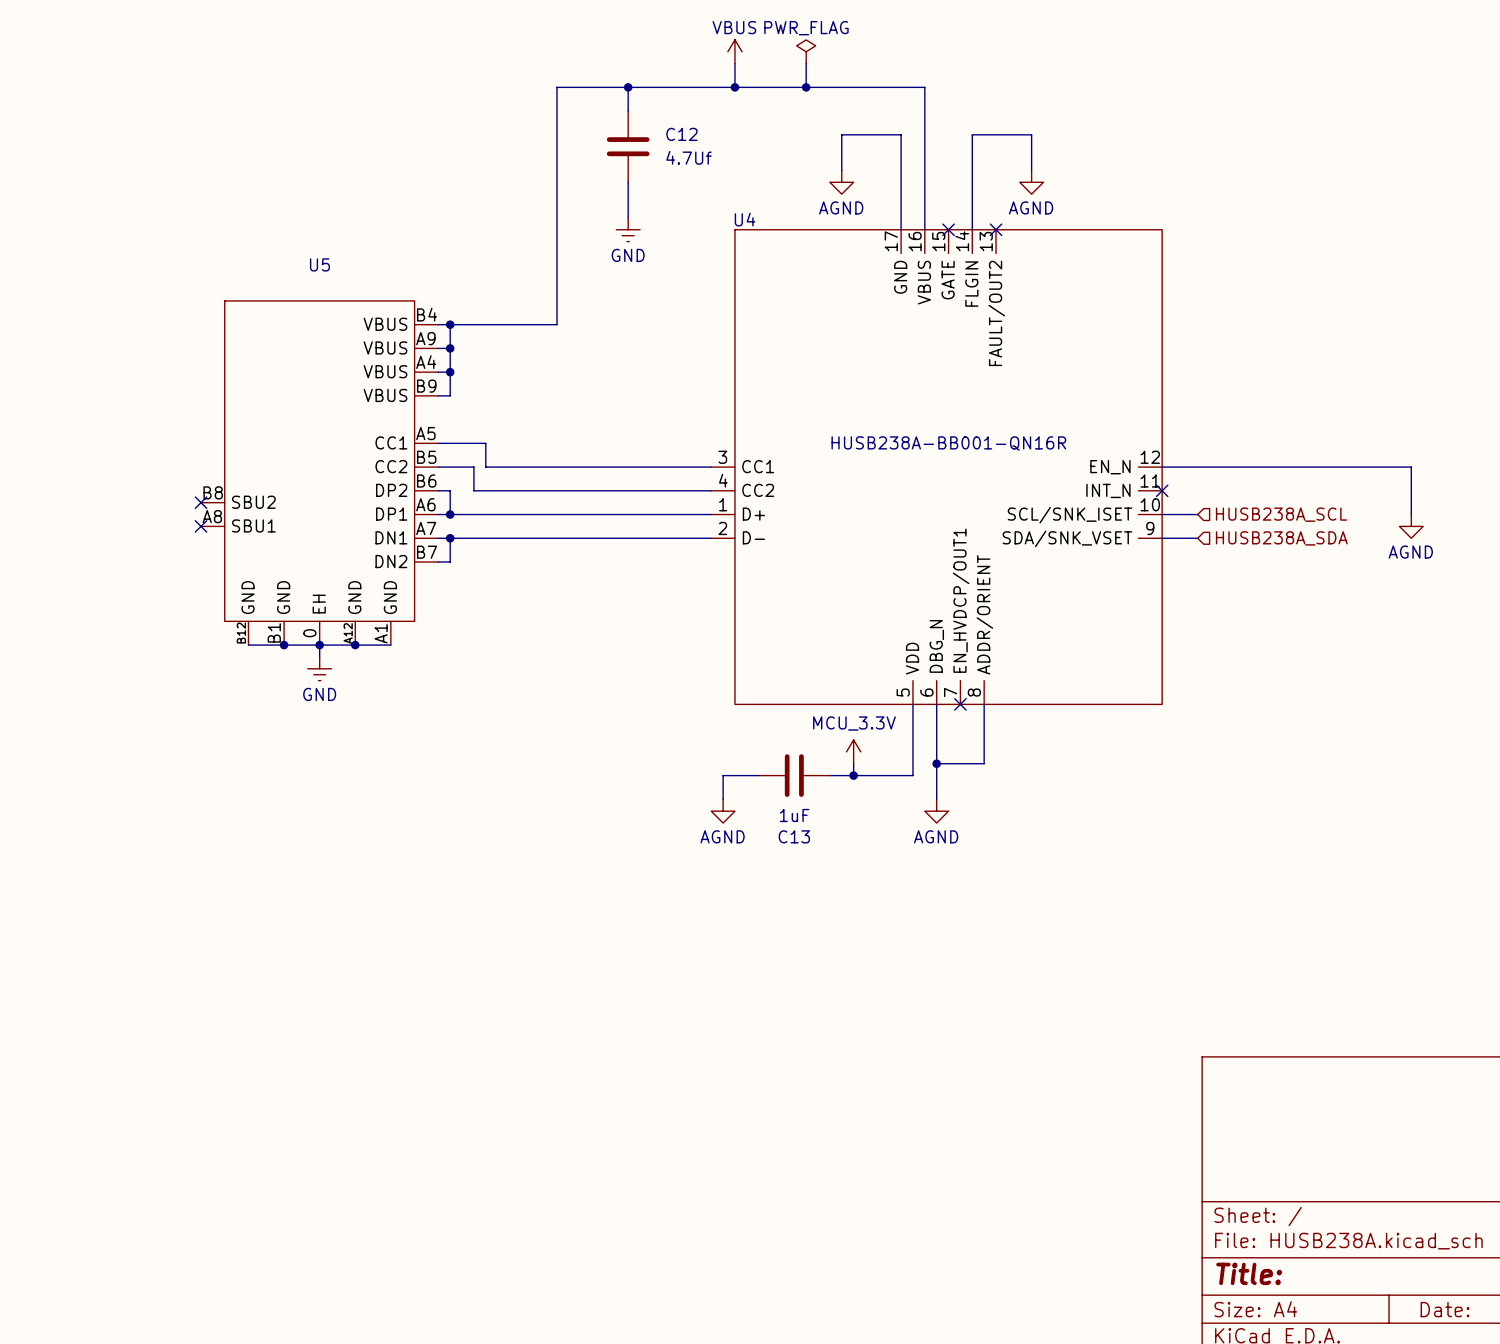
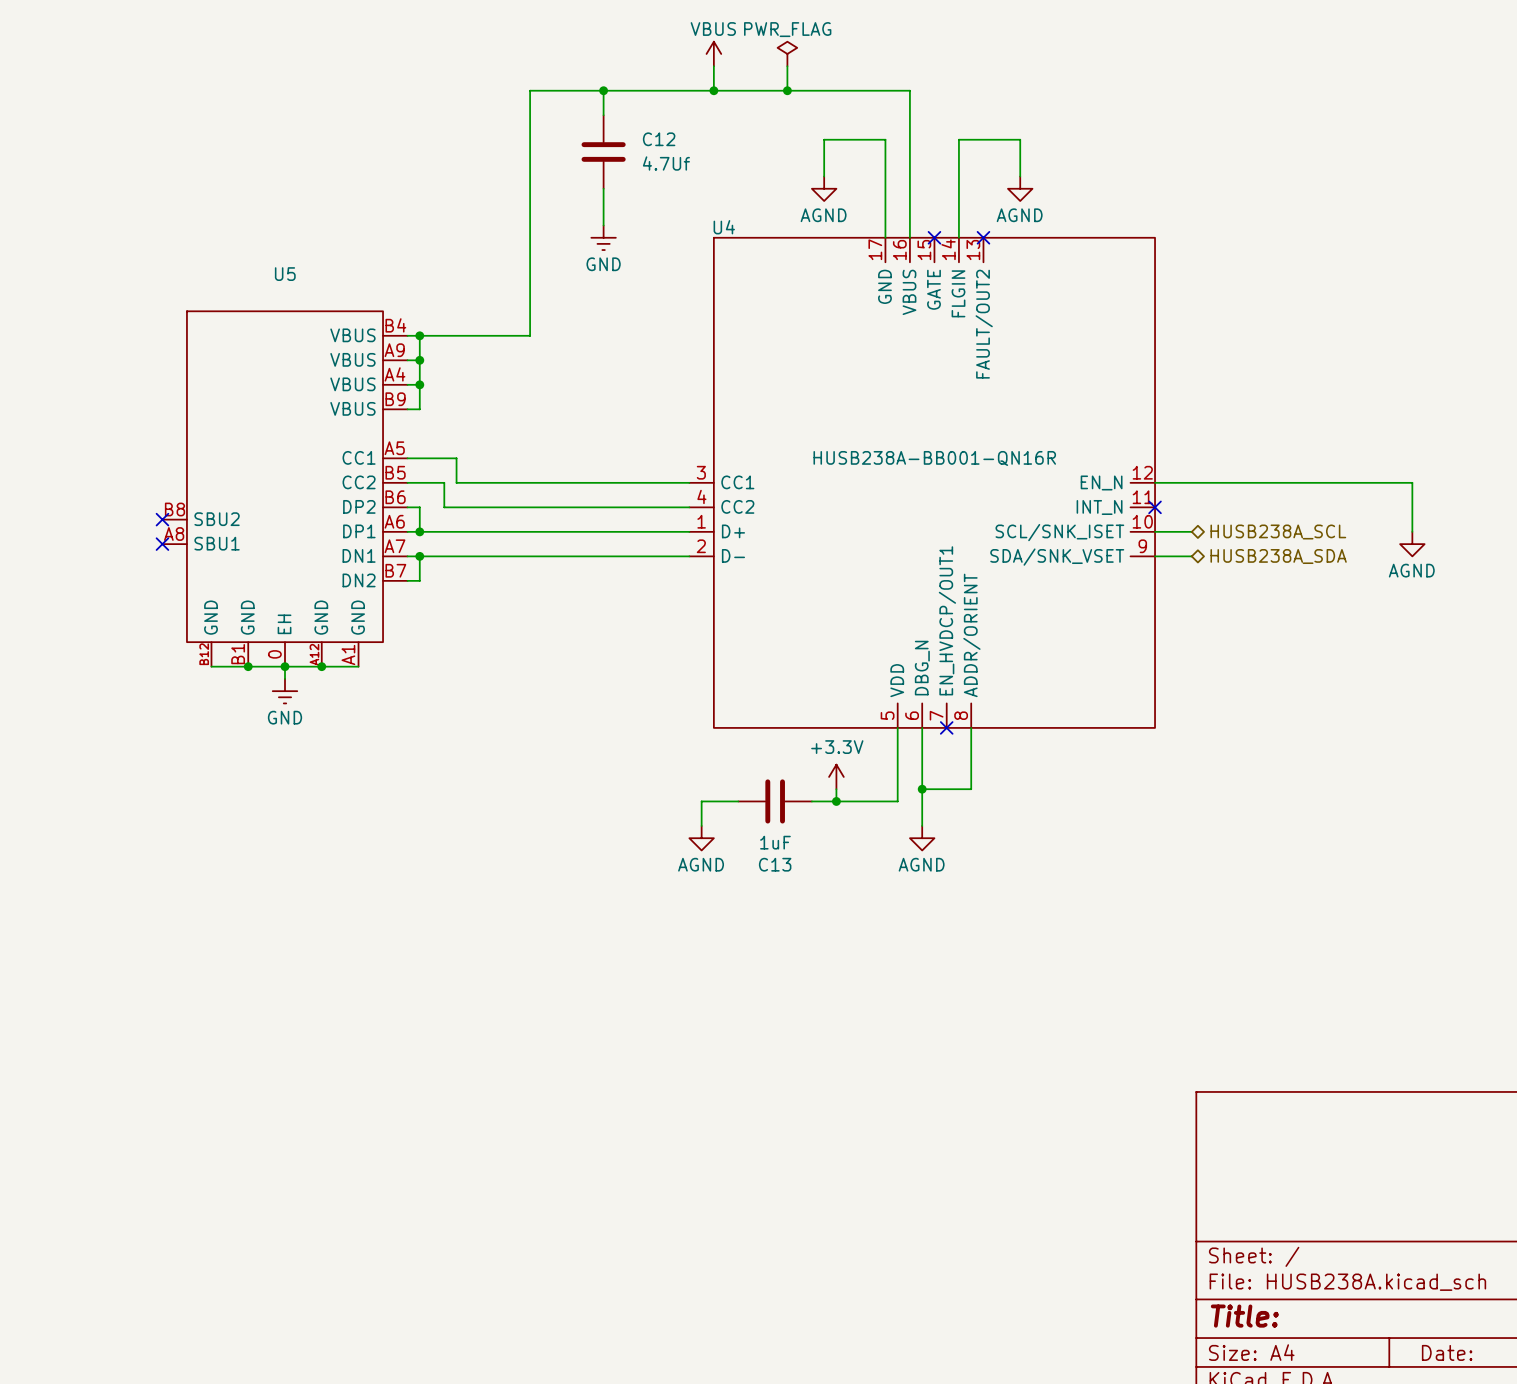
hierarchical label shape: input (1281, 514) -> bidirectional (1278, 531)
hierarchical label shape: input (1281, 538) -> bidirectional (1278, 556)
power symbol: MCU_3.3V (853, 751) -> +3.3V (836, 776)

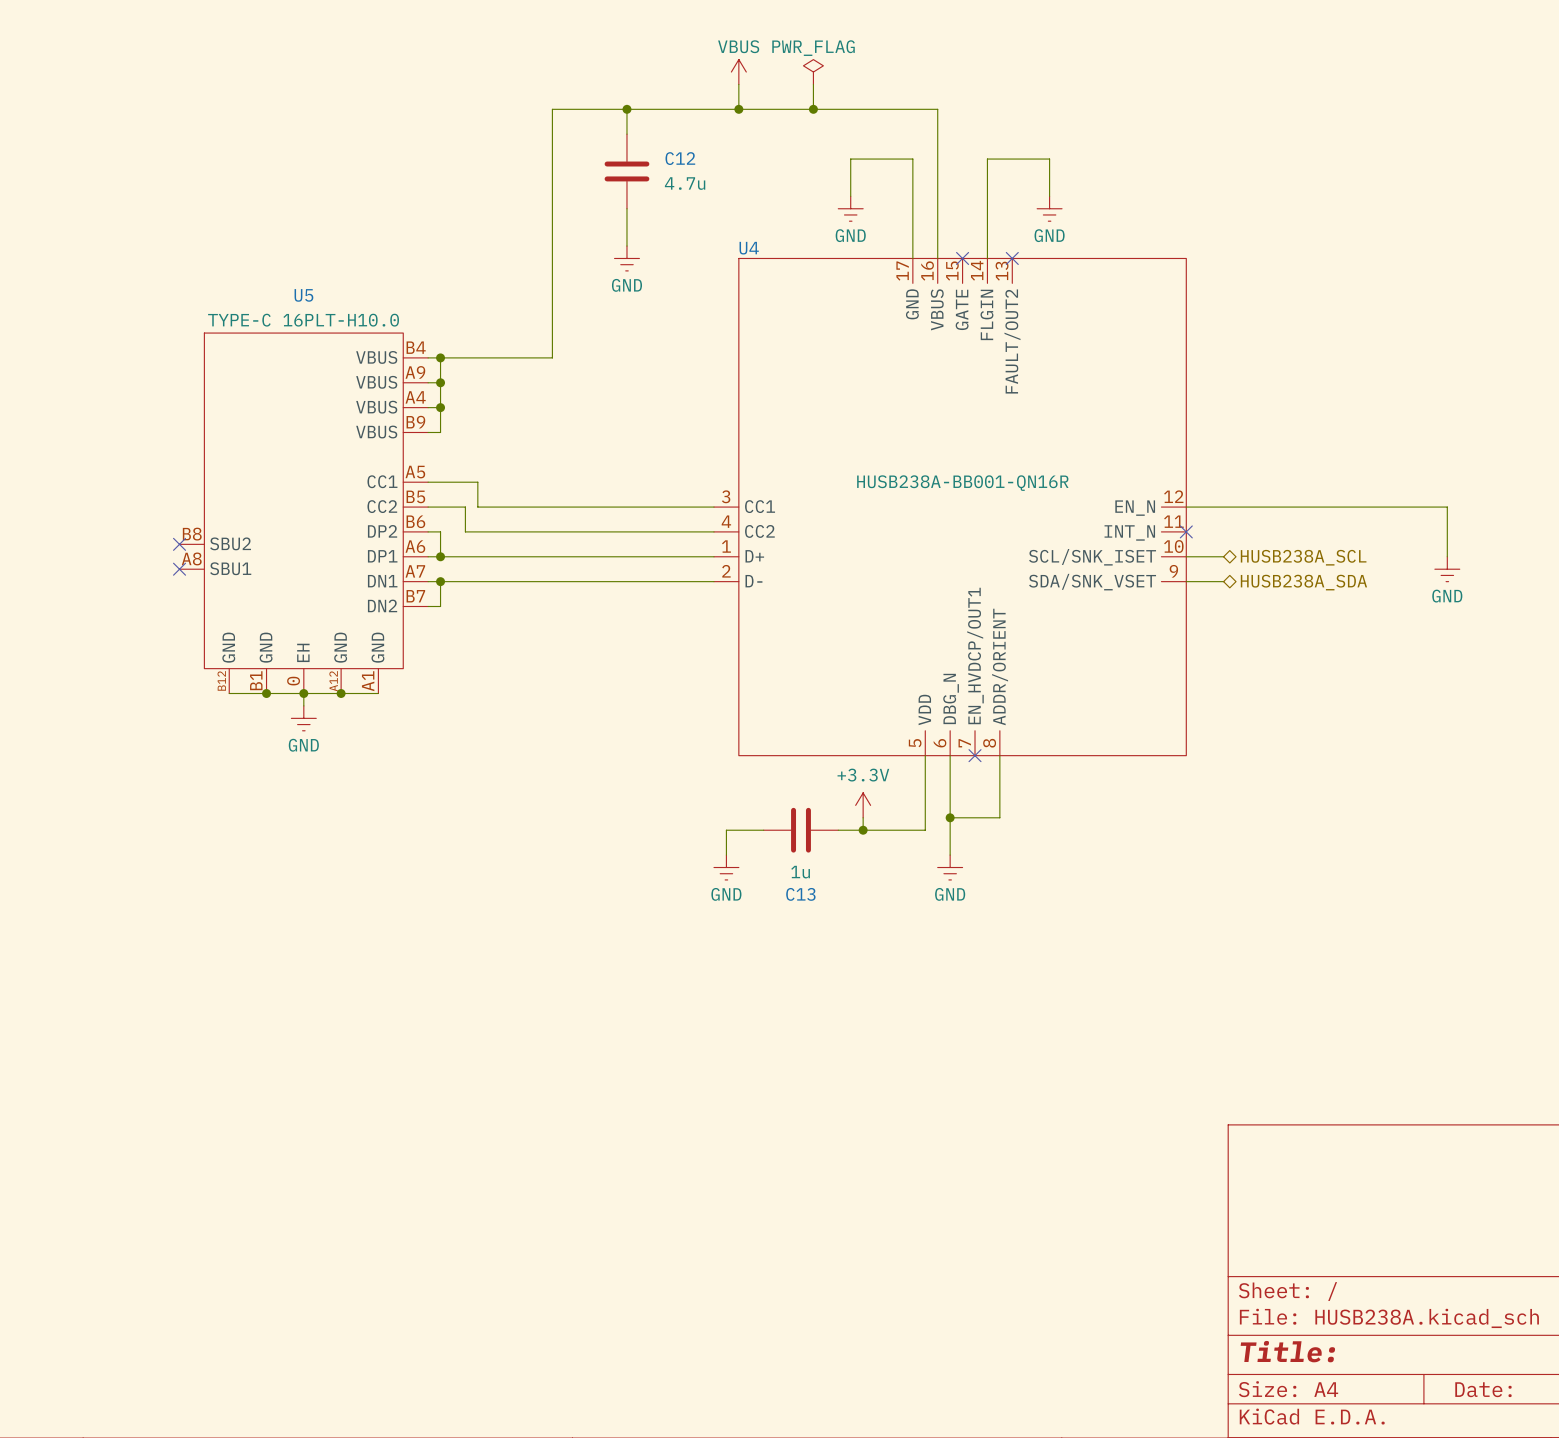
C12 value: 4.7Uf (666, 163) -> 4.7u (685, 183)
power symbol: AGND (824, 188) -> GND (850, 208)
power symbol: AGND (1020, 188) -> GND (1049, 208)
U5 value: none -> TYPE-C 16PLT-H10.0 (303, 320)
power symbol: AGND (1412, 544) -> GND (1447, 569)
power symbol: AGND (701, 838) -> GND (726, 867)
power symbol: AGND (922, 838) -> GND (950, 867)
C13 value: 1uF (775, 842) -> 1u (800, 872)

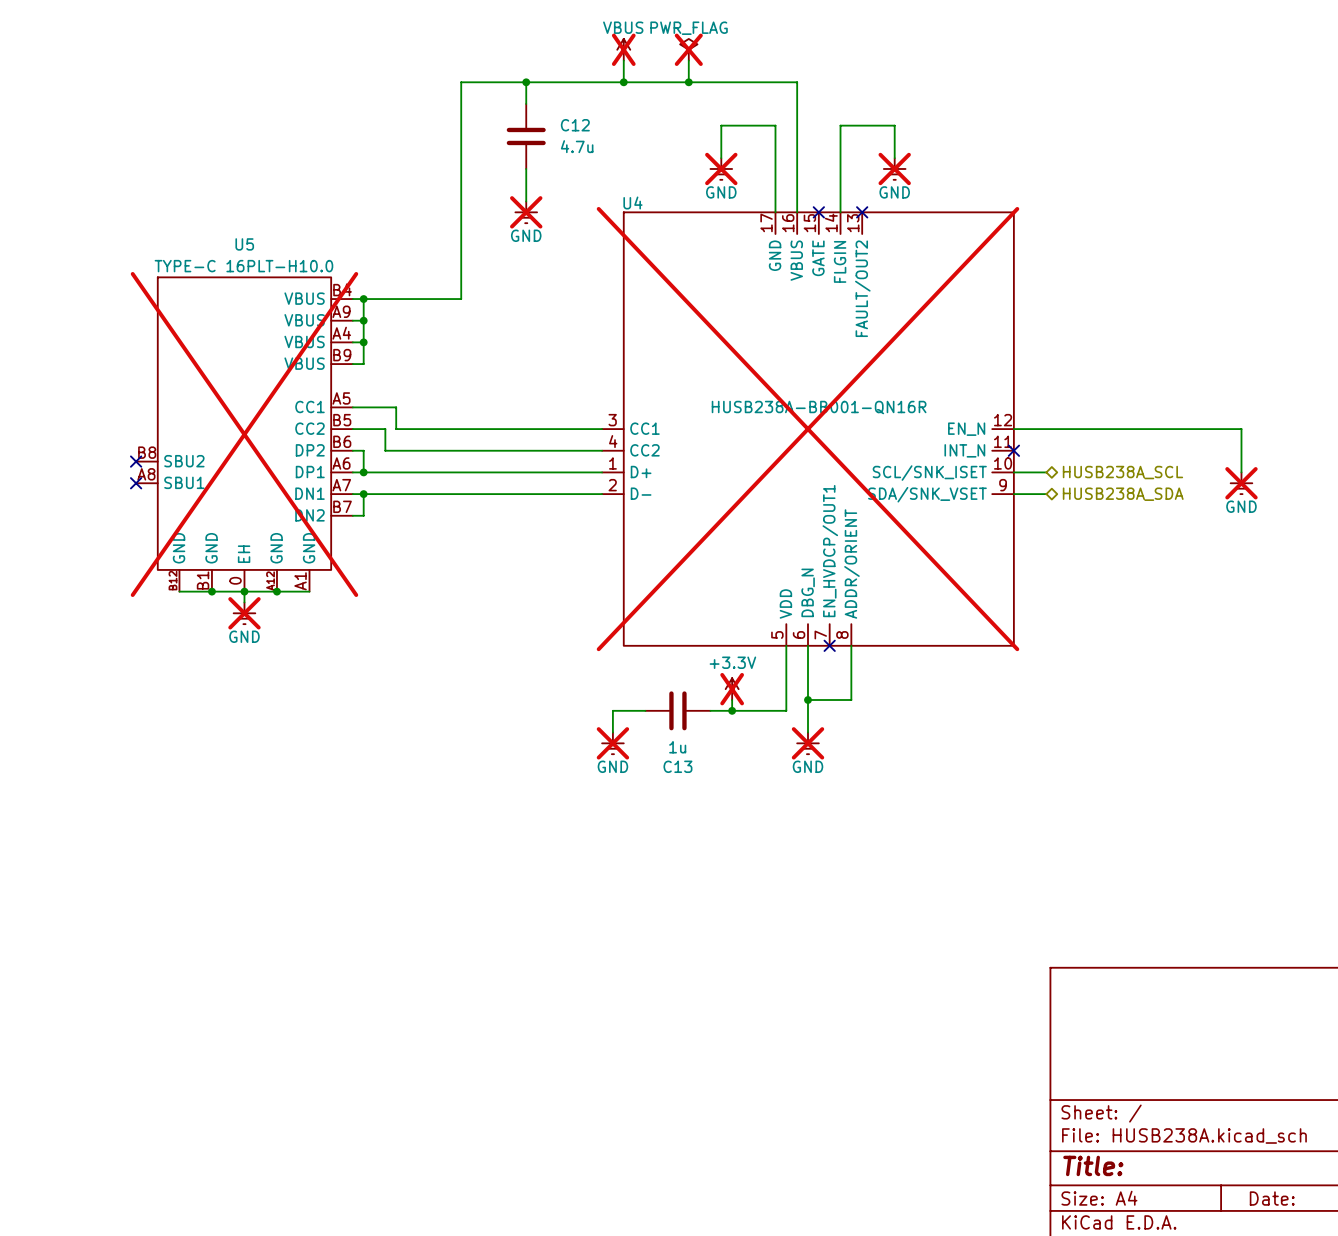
power symbol do-not-place cross: none -> (623, 49)
power symbol do-not-place cross: none -> (688, 49)
power symbol do-not-place cross: none -> (721, 168)
power symbol do-not-place cross: none -> (894, 168)
power symbol do-not-place cross: none -> (526, 212)
U4 do-not-place cross: none -> (808, 429)
U5 do-not-place cross: none -> (244, 434)
power symbol do-not-place cross: none -> (1241, 483)
power symbol do-not-place cross: none -> (244, 613)
power symbol do-not-place cross: none -> (732, 689)
power symbol do-not-place cross: none -> (612, 743)
power symbol do-not-place cross: none -> (808, 743)

